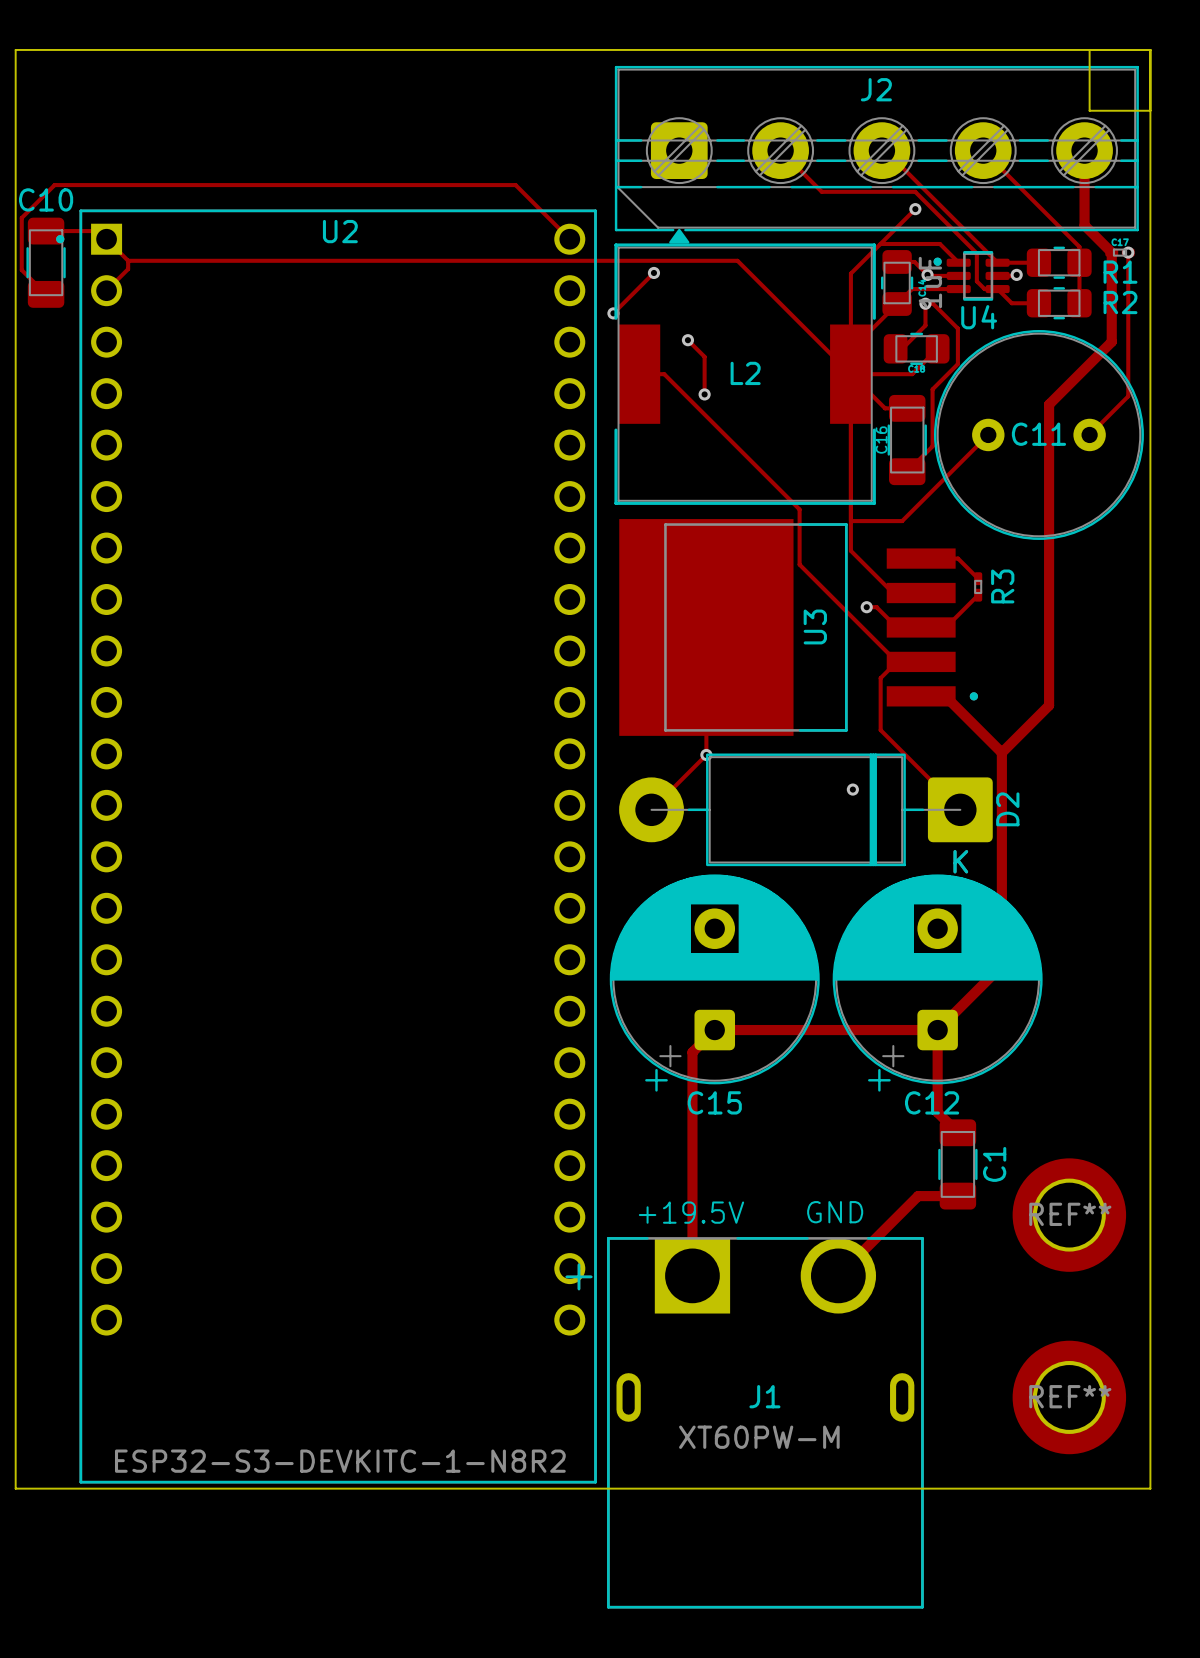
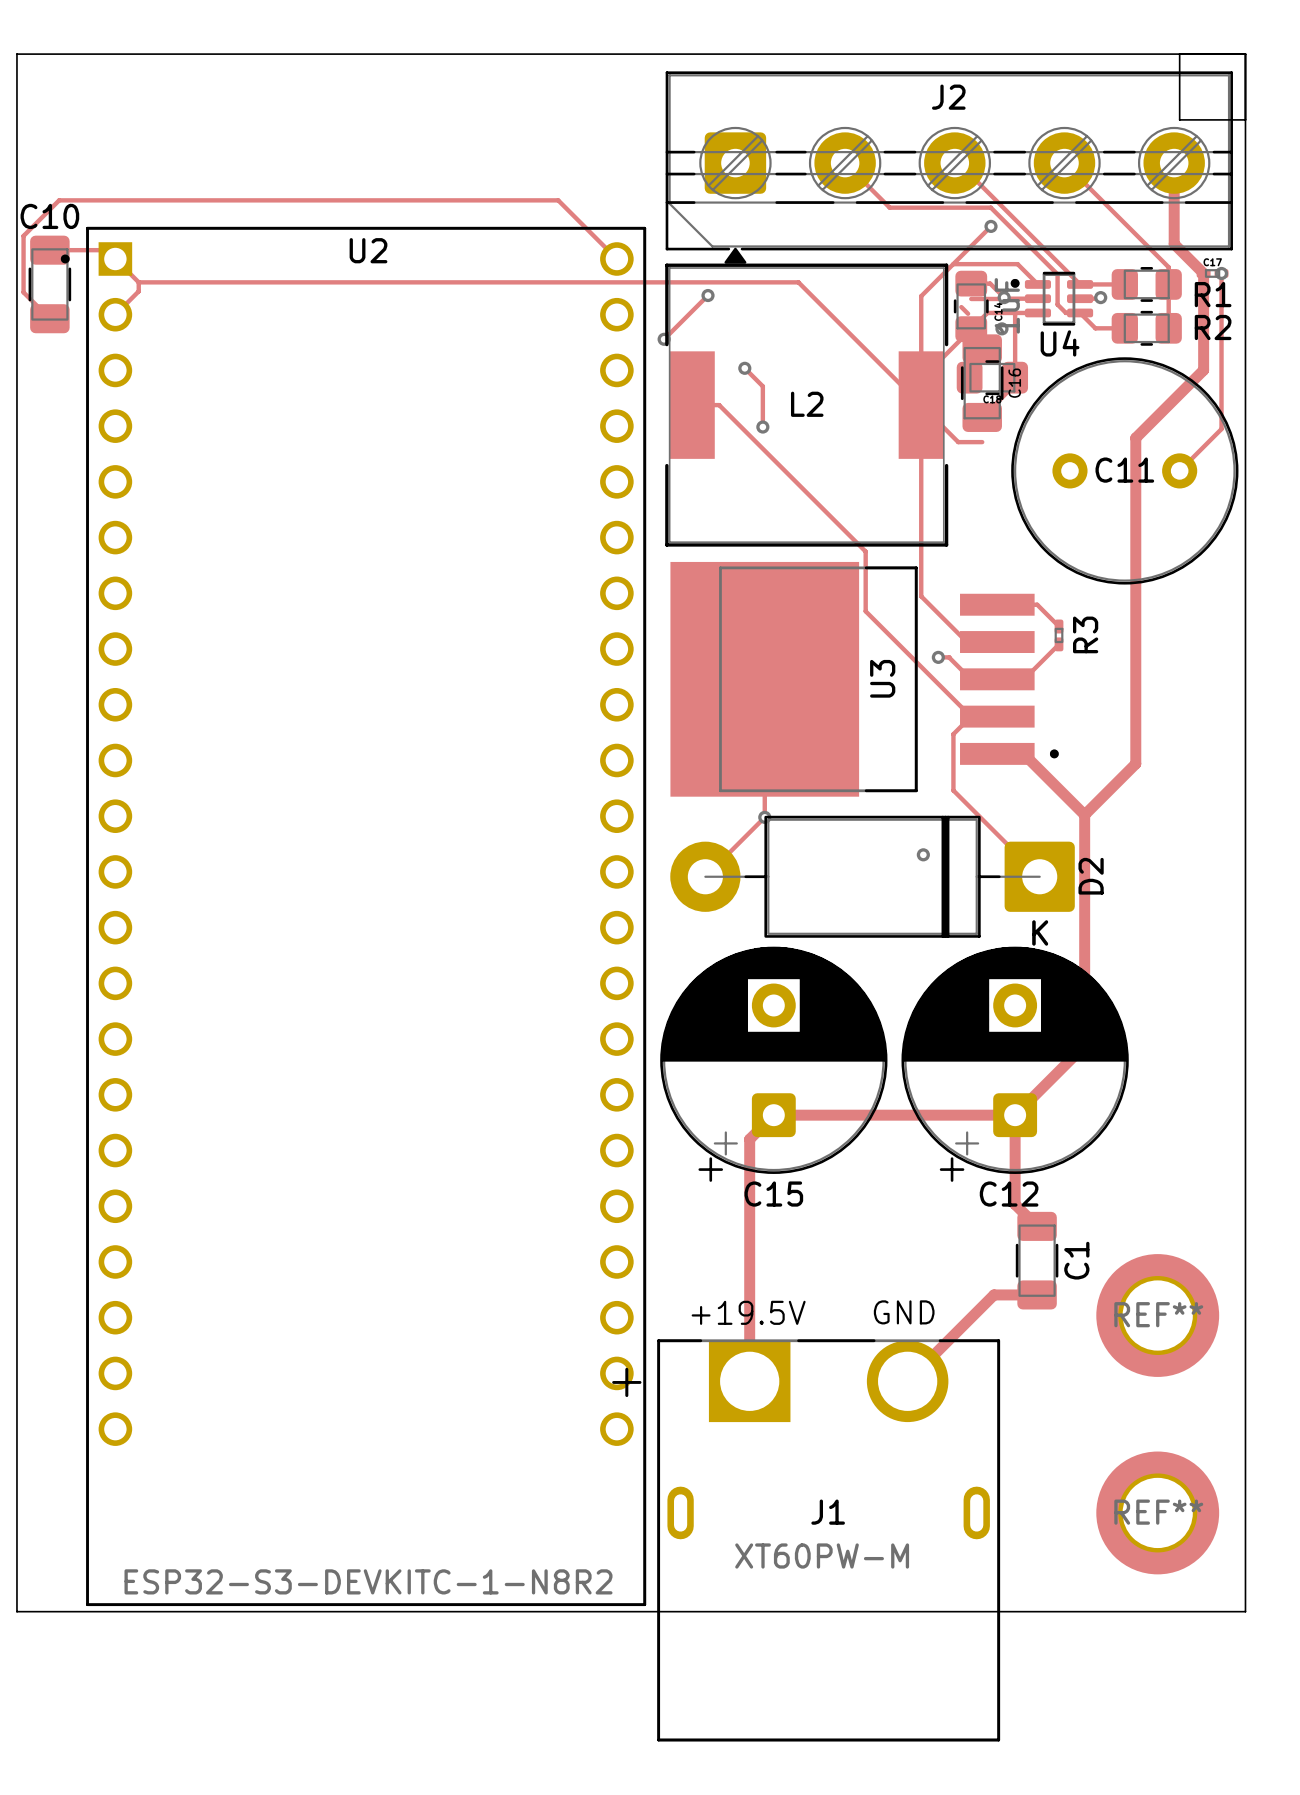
track: none -> (971, 298) (1002, 298)
track: none -> (961, 307) (968, 313)
track: none -> (1015, 312) (1015, 384) (982, 417)
track: (895, 348) (902, 348) (925, 325) (925, 303) (933, 303) (957, 328) (957, 364) (932, 389) (932, 446) (907, 471) -> none
track: (937, 348) (912, 374) (850, 374) -> none
track: (988, 434) (902, 521) (850, 521) -> none
C16 name position: C16 (881, 440) -> C16 (1014, 383)
C16 position: (907, 440) -> (982, 383)

